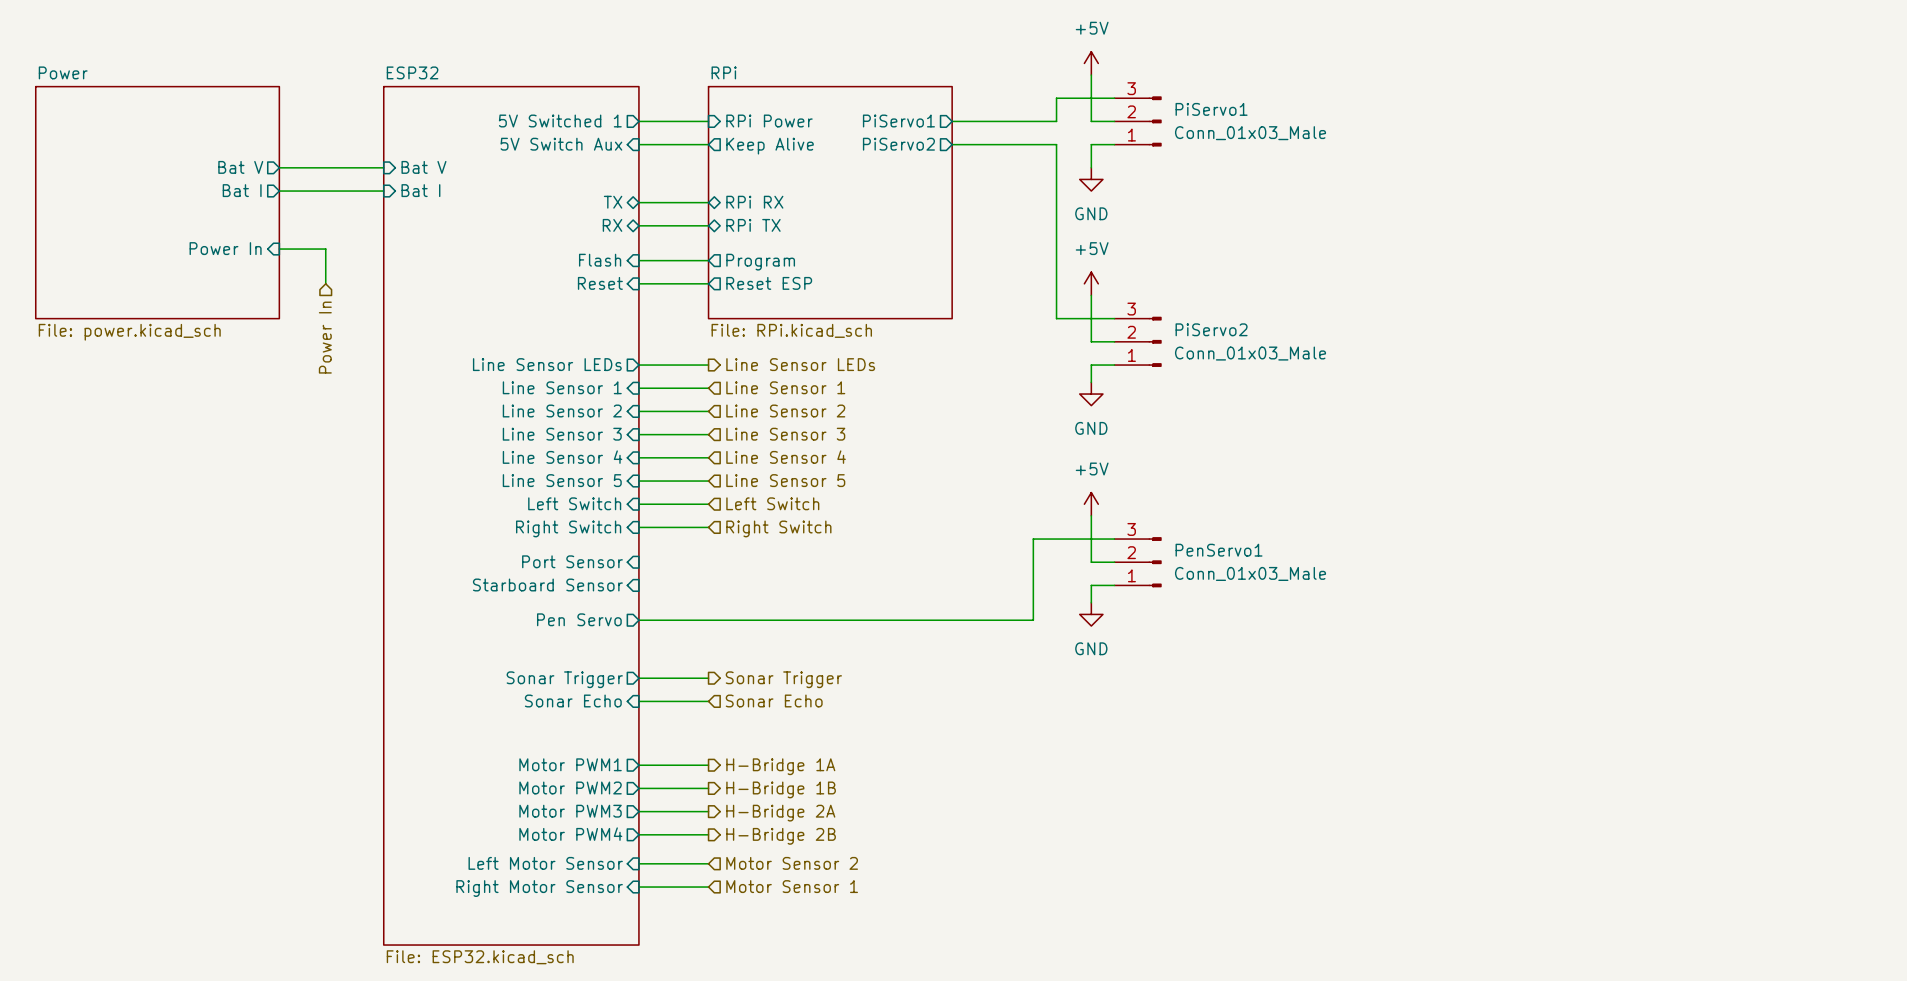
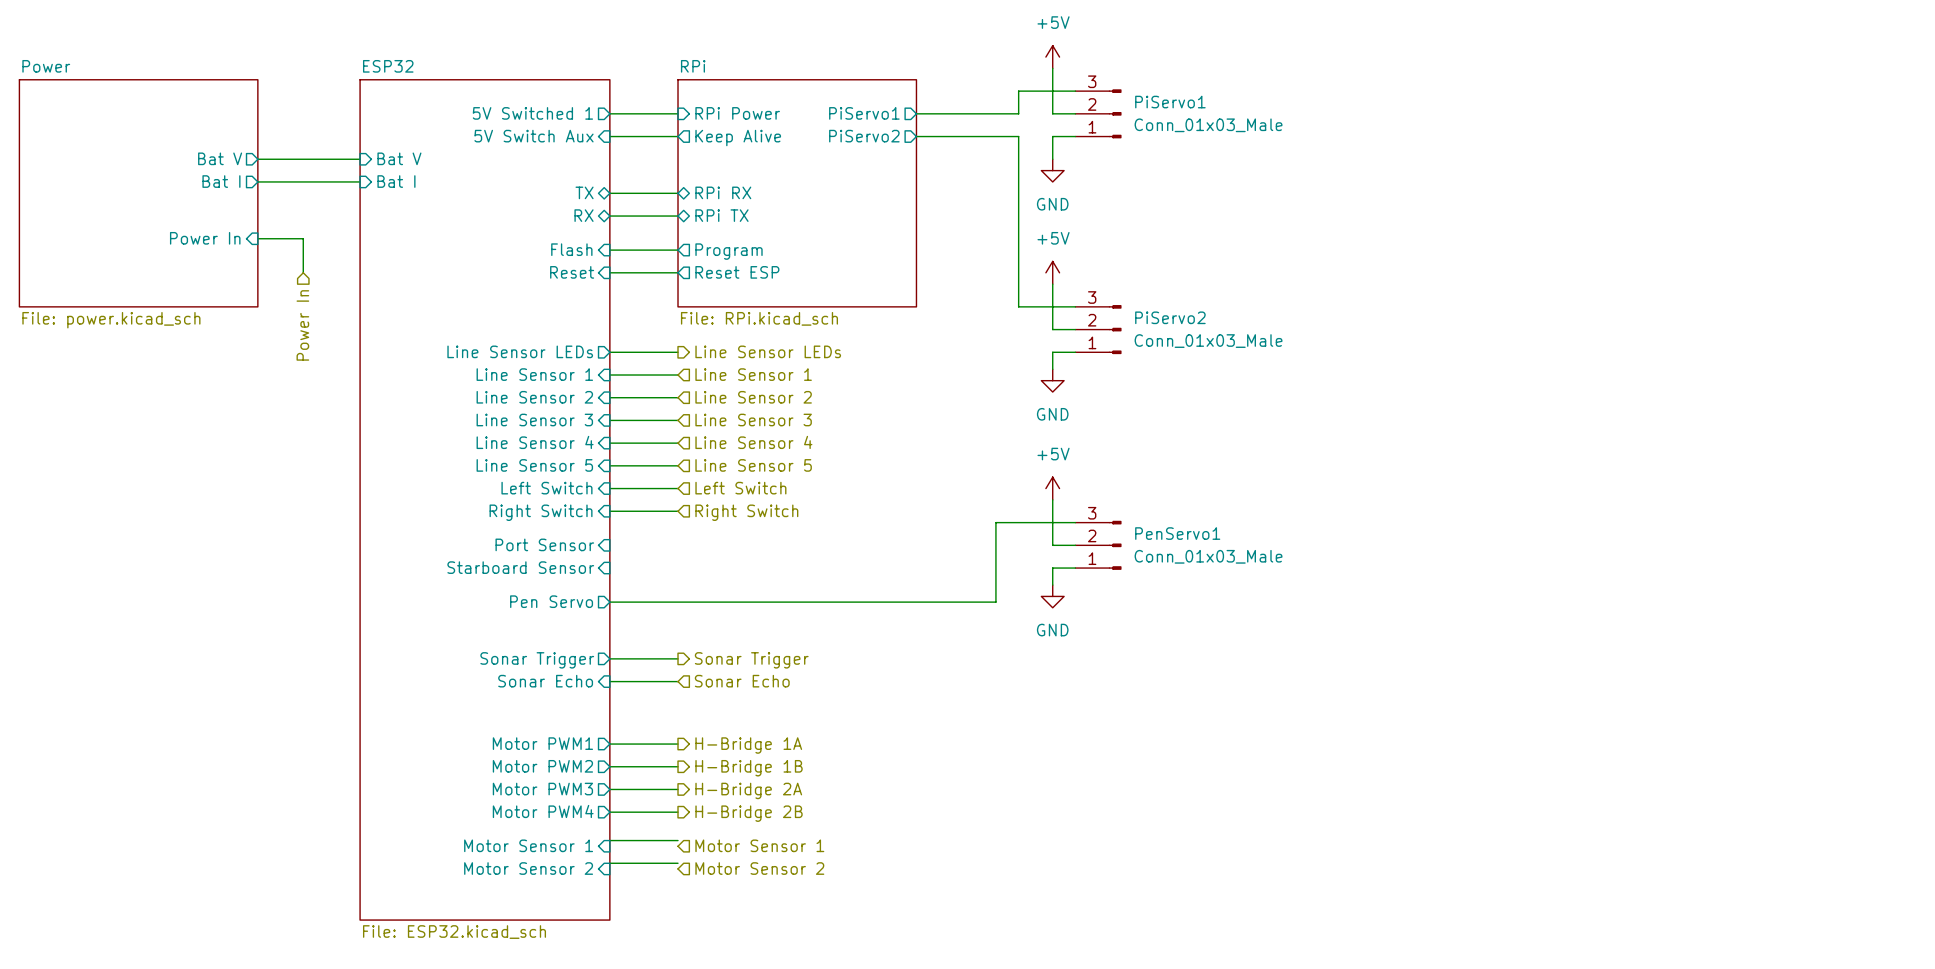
sheet pin: Left Motor Sensor (545, 863) -> Motor Sensor 1 (528, 845)
hierarchical label: Motor Sensor 2 (792, 863) -> Motor Sensor 1 (759, 845)
hierarchical label: Motor Sensor 1 (792, 886) -> Motor Sensor 2 (759, 868)
sheet pin: Right Motor Sensor (539, 888) -> Motor Sensor 2 (528, 868)

